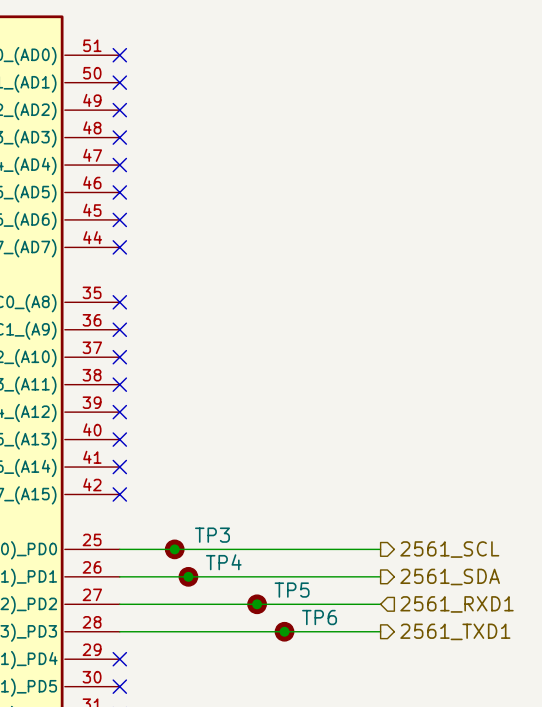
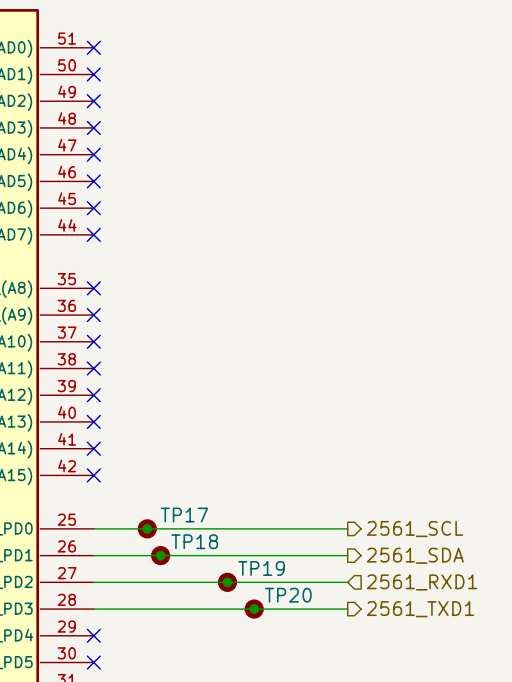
TP3 name: TP3 (212, 535) -> TP17 (184, 515)
TP4 name: TP4 (223, 562) -> TP18 (194, 541)
TP5 name: TP5 (292, 590) -> TP19 (261, 568)
TP6 name: TP6 (319, 617) -> TP20 (288, 595)

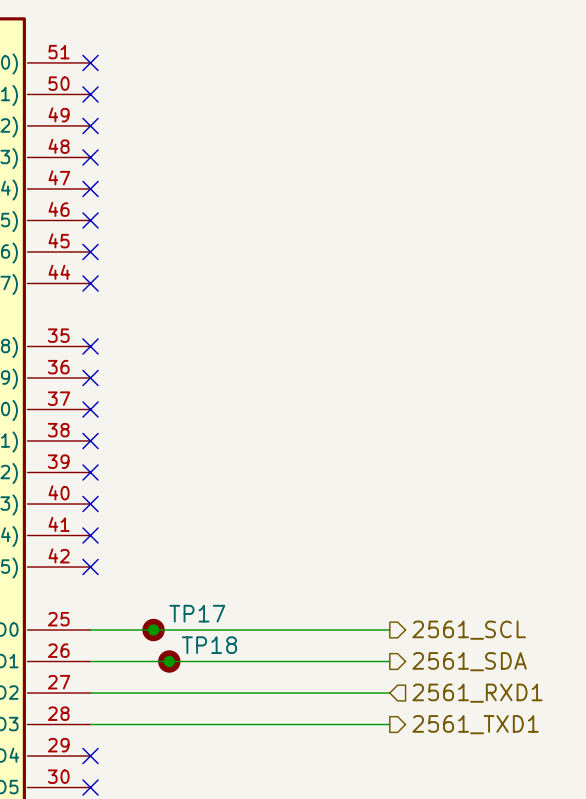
junction: (227, 582) -> none
TP19: (227, 582) -> none
junction: (254, 609) -> none
TP20: (254, 609) -> none

